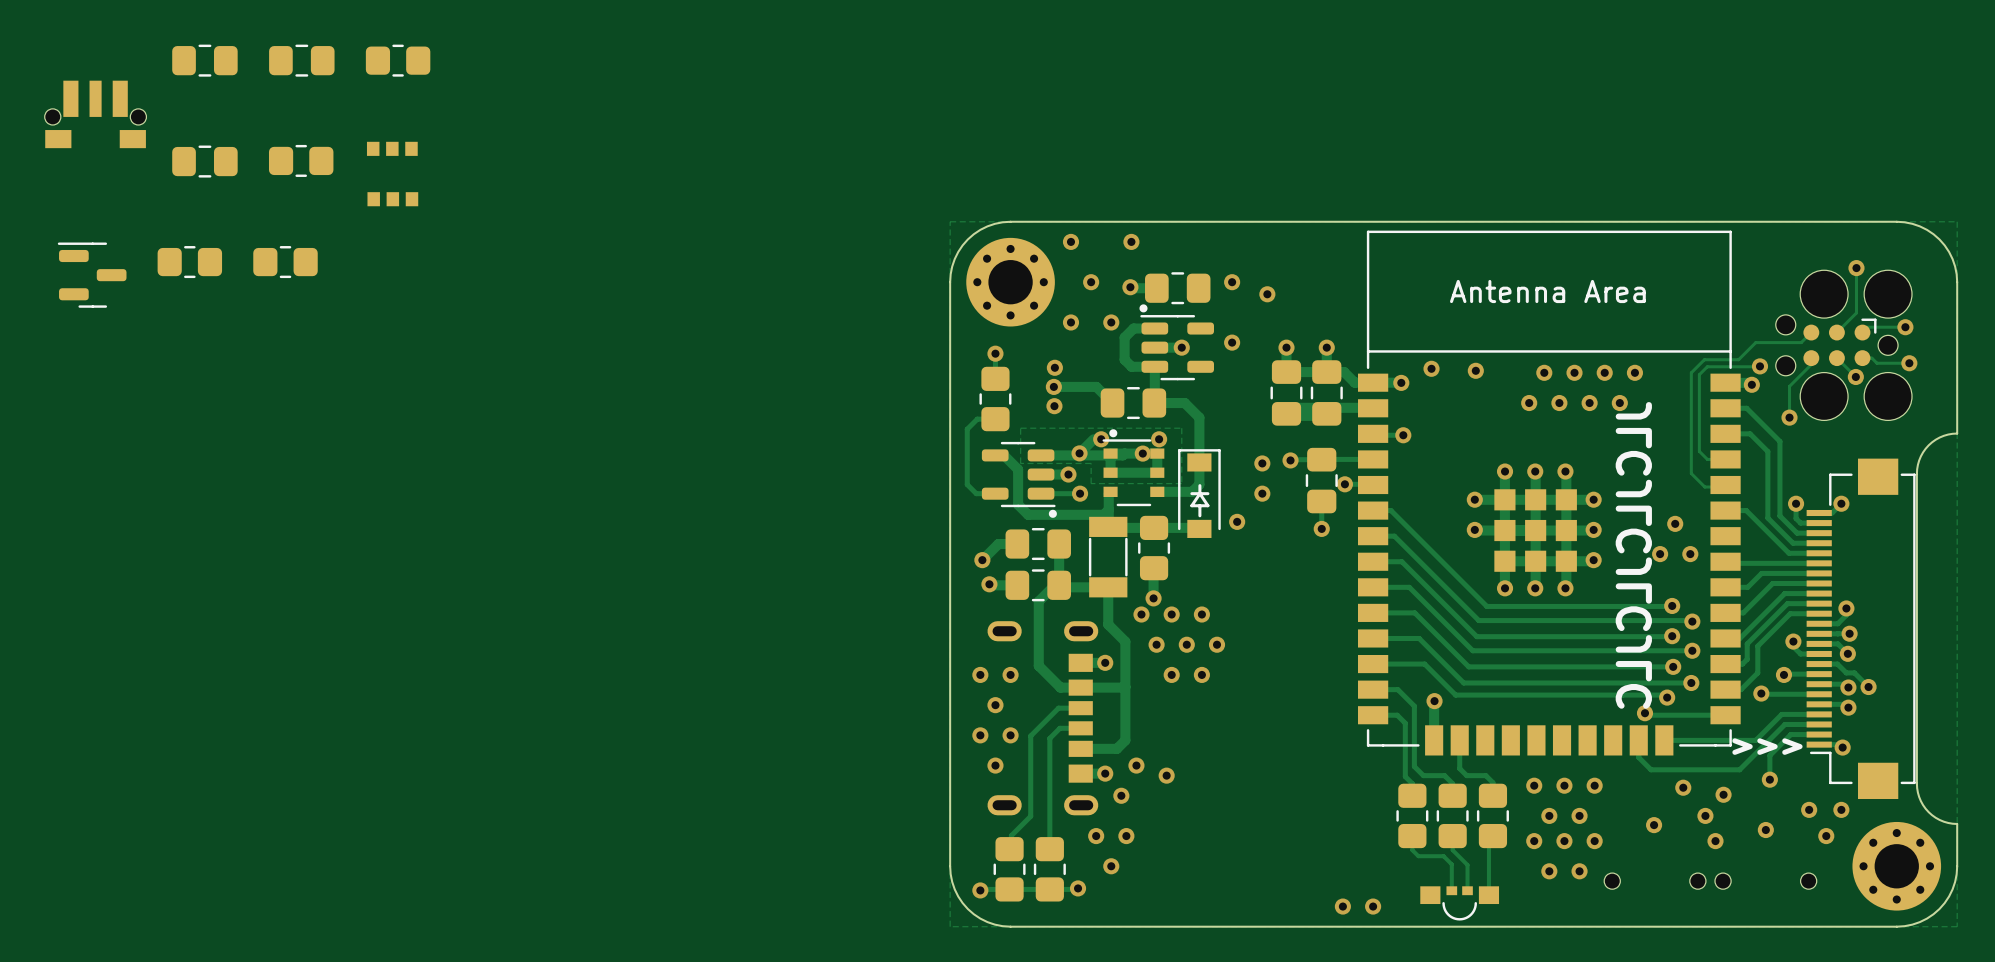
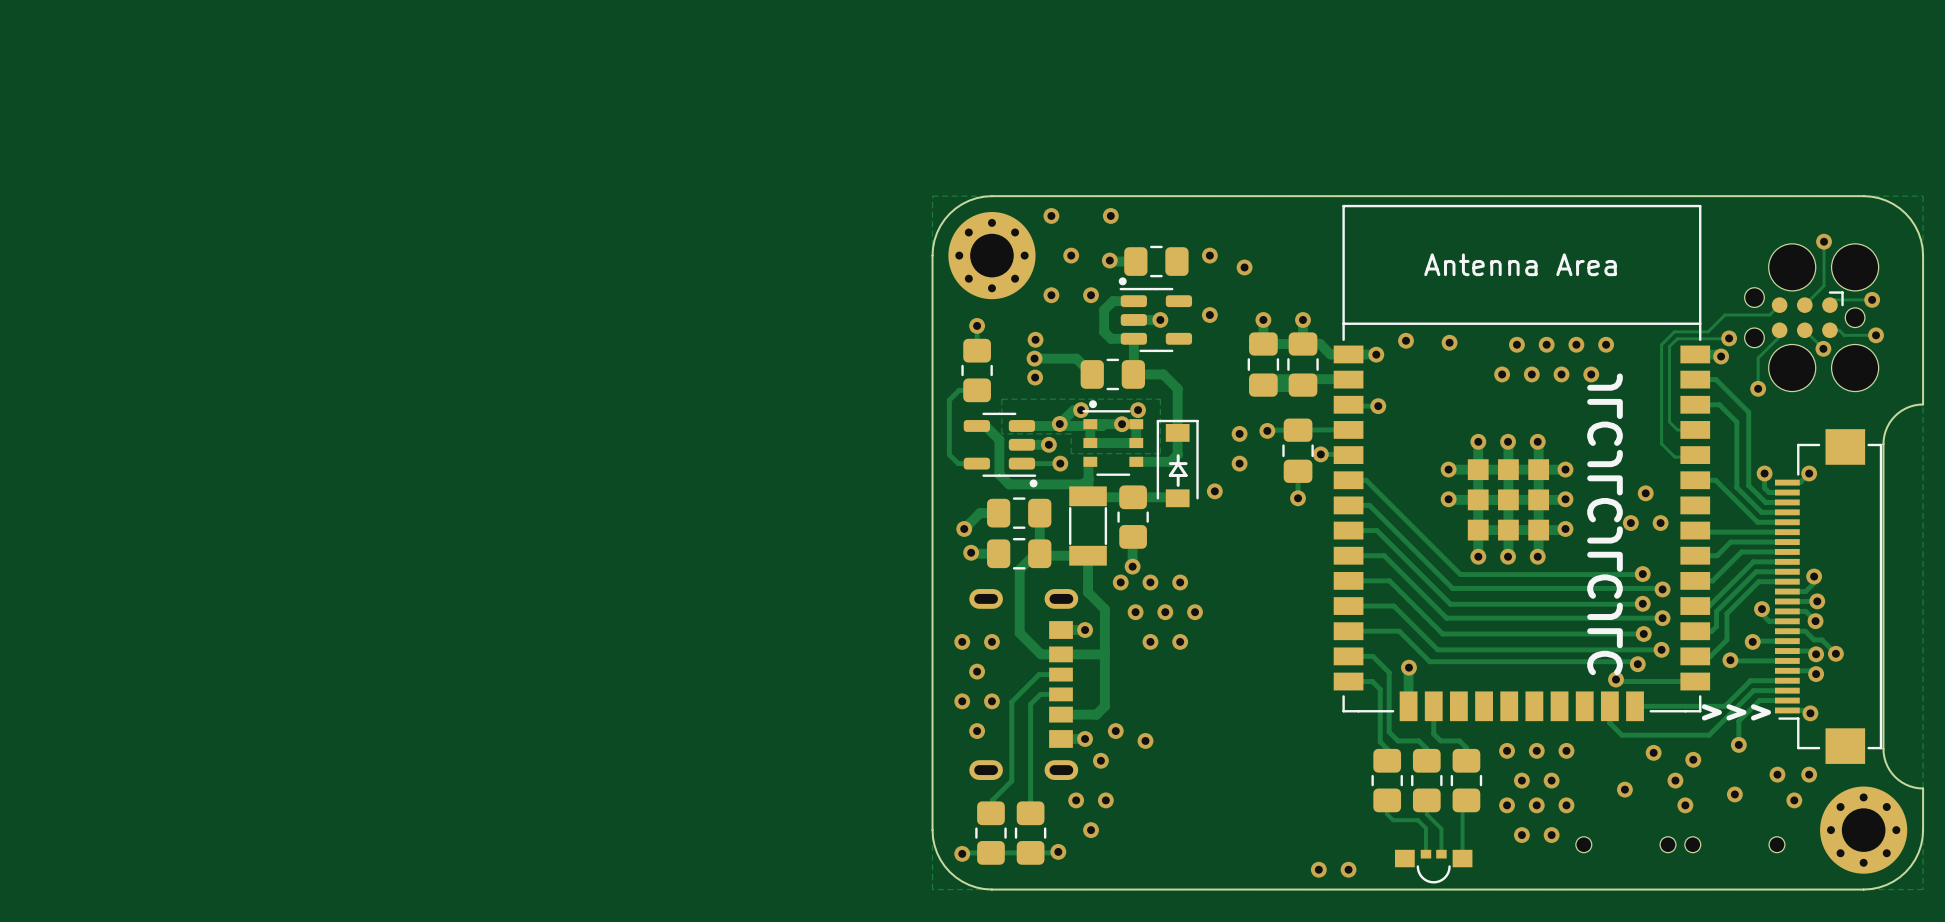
part: (204, 60) -> none
part: (301, 60) -> none
part: (398, 60) -> none
part: (95, 114) -> none
part: (301, 160) -> none
part: (204, 161) -> none
part: (392, 174) -> none
part: (189, 262) -> none
part: (285, 262) -> none
part: (92, 275) -> none

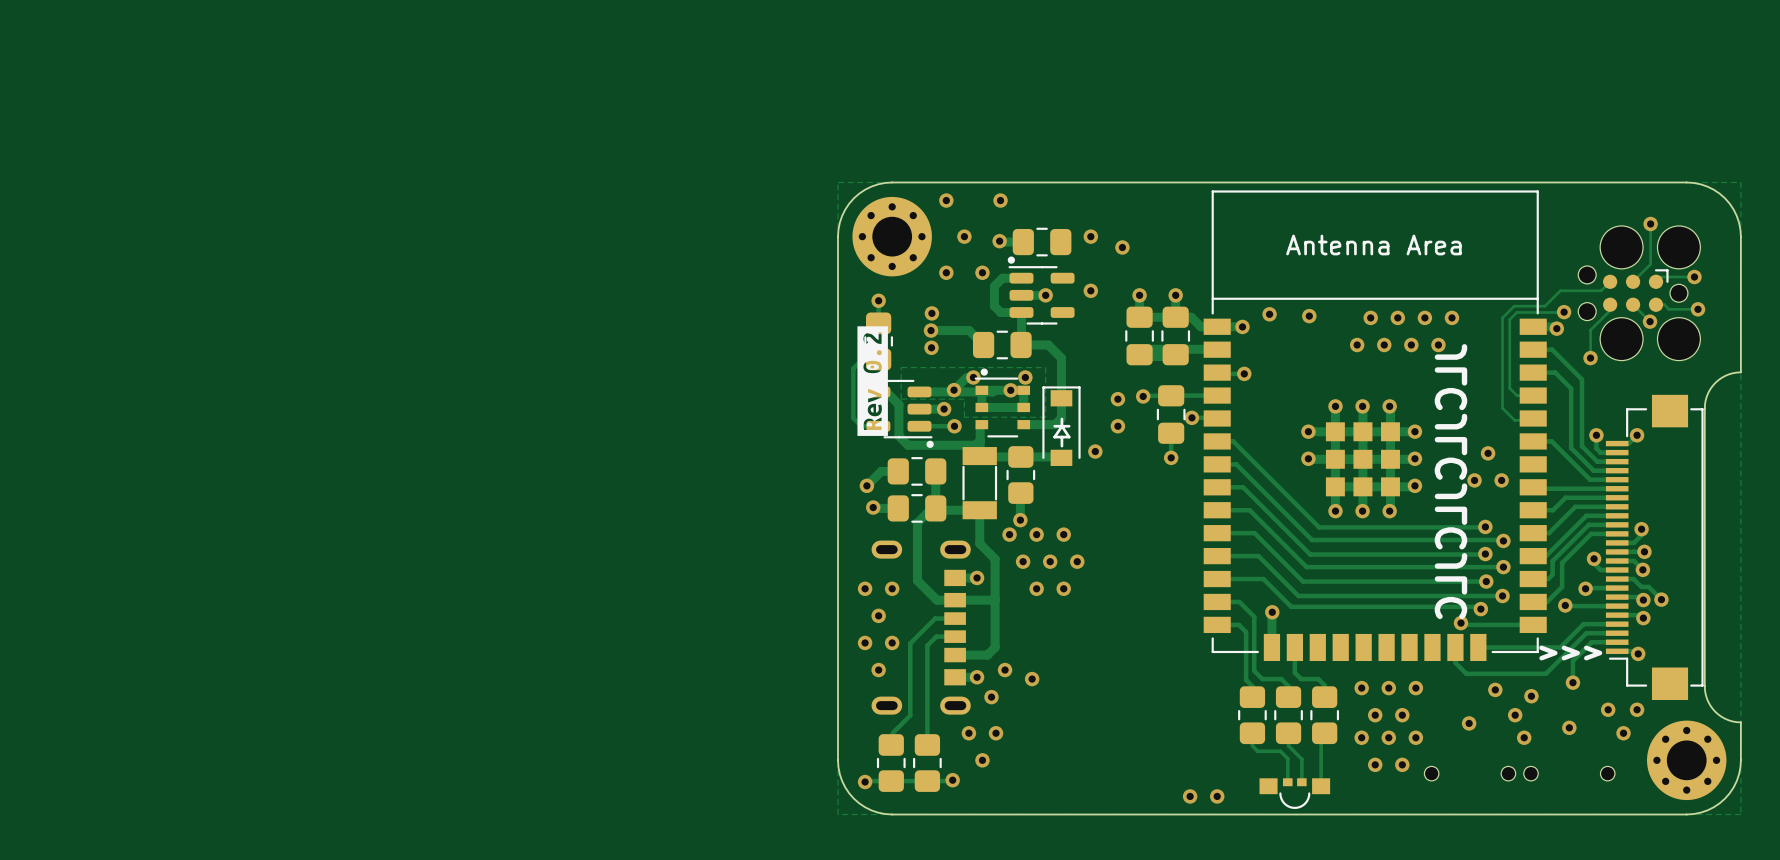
drawing: none -> [857, 326, 888, 436]

